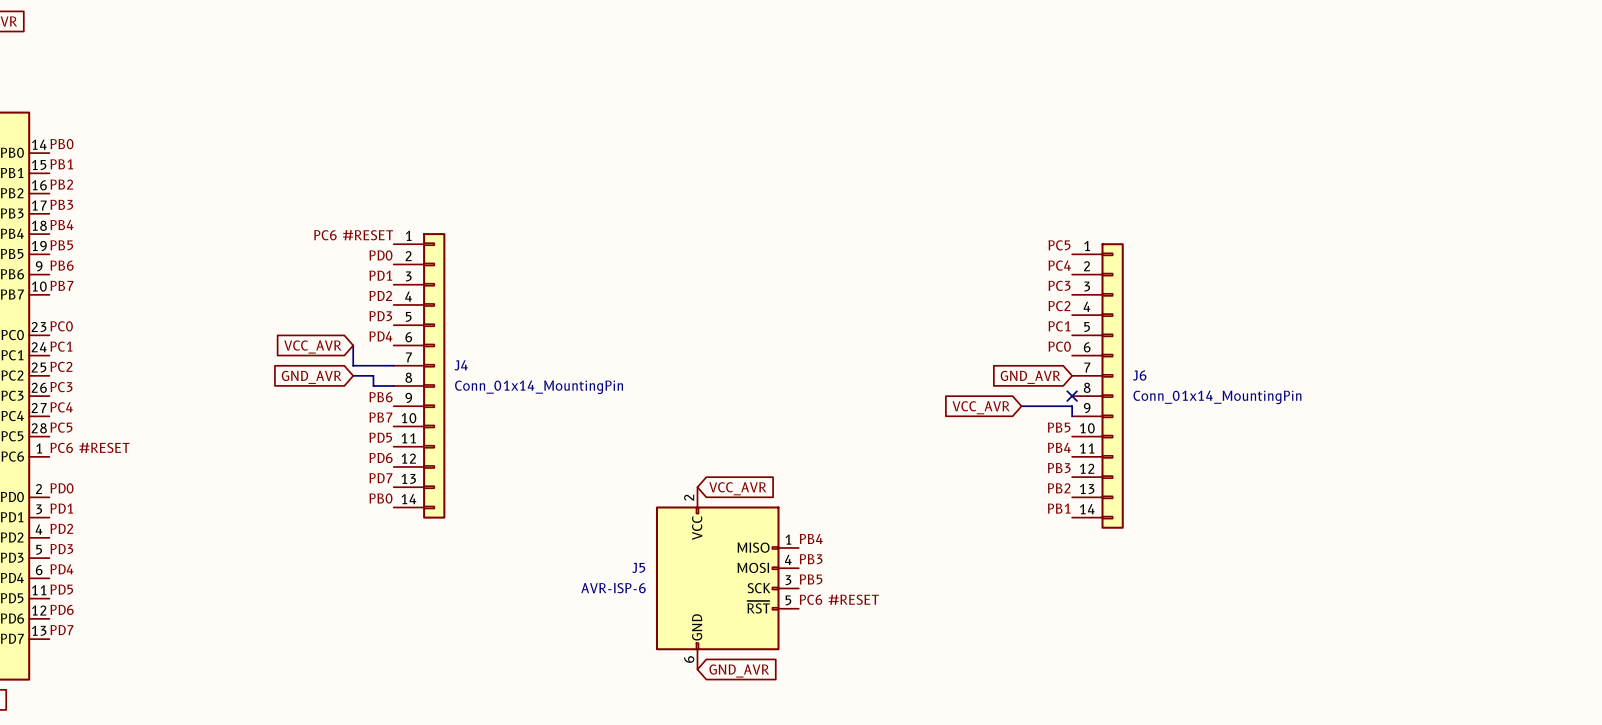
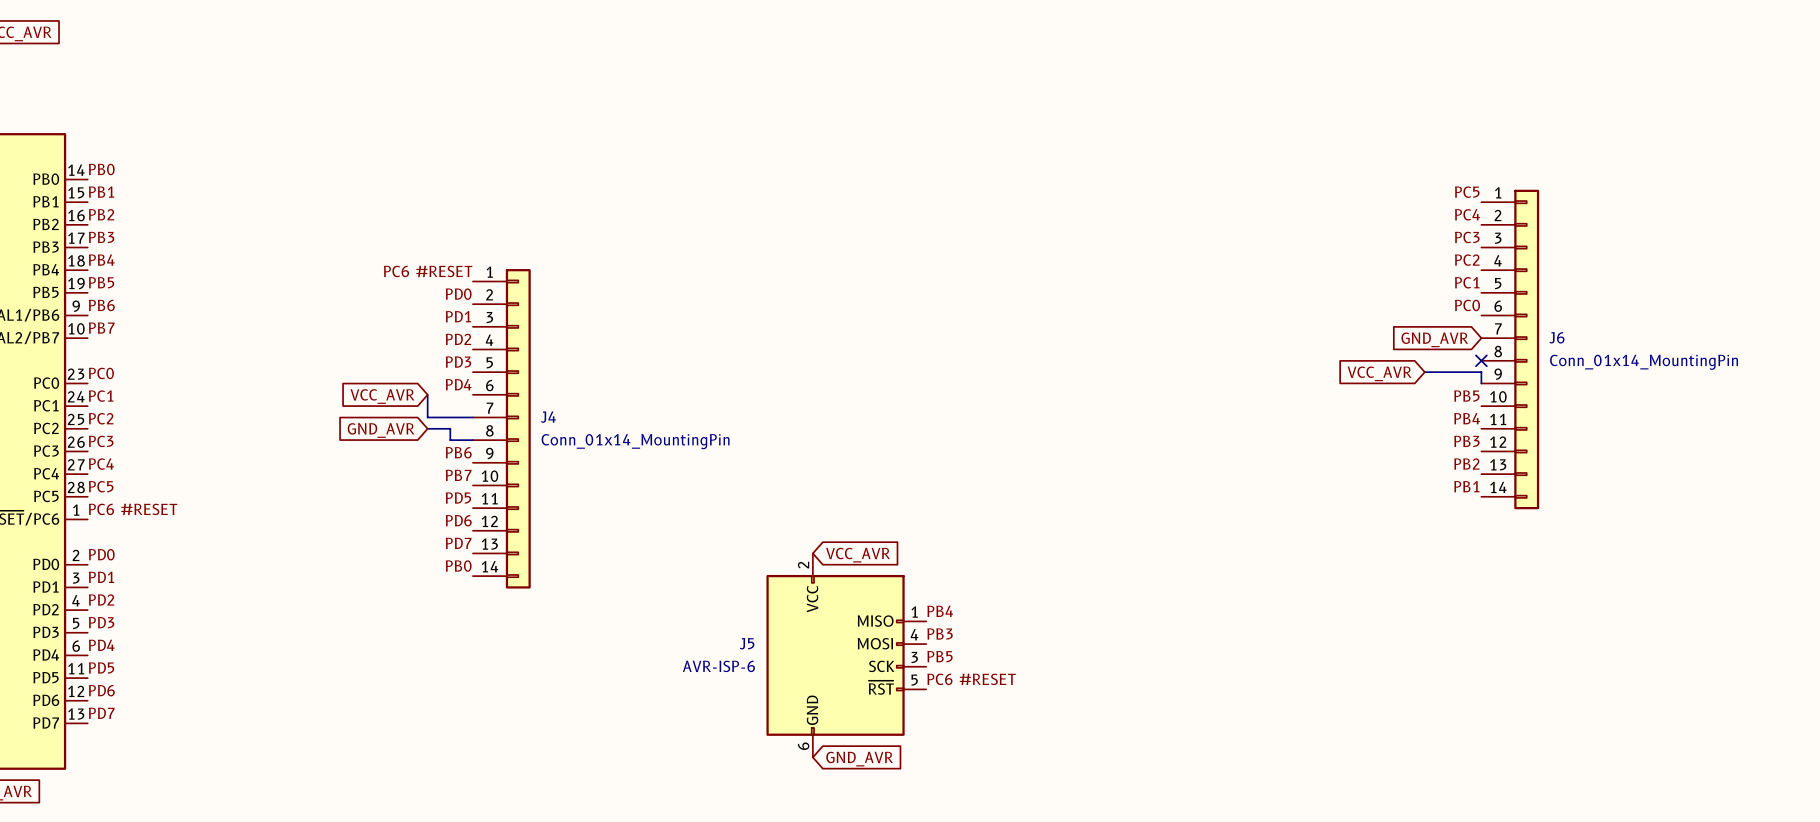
label: none -> PC5 (1467, 192)
label: none -> PC4 (1467, 214)
label: none -> PC3 (1467, 237)
label: none -> PC2 (1467, 260)
label: PC5 (1059, 245) -> none
label: none -> PC1 (1467, 282)
label: PC4 (1059, 265) -> none
label: none -> PC0 (1467, 305)
label: PC3 (1059, 285) -> none
global label: none -> GND_AVR (1434, 339)
label: PC2 (1059, 306) -> none
no-connect mark: none -> (1481, 360)
wire: none -> (1424, 372) (1481, 372) (1481, 383)
label: PC1 (1059, 326) -> none
global label: none -> VCC_AVR (1379, 373)
label: PC0 (1059, 346) -> none
label: none -> PB5 (1466, 396)
label: none -> PB4 (1467, 418)
global label: GND_AVR (1030, 377) -> none
J6 position: (1097, 385) -> (1510, 349)
label: none -> PB3 (1466, 441)
no-connect mark: (1072, 396) -> none
wire: (1021, 406) (1072, 406) (1072, 416) -> none
global label: VCC_AVR (981, 407) -> none
label: none -> PB2 (1466, 464)
label: PB5 (1059, 427) -> none
label: none -> PB1 (1466, 486)
label: PB4 (1059, 447) -> none
label: PB3 (1059, 468) -> none
label: PB2 (1059, 488) -> none
label: PB1 (1059, 508) -> none

